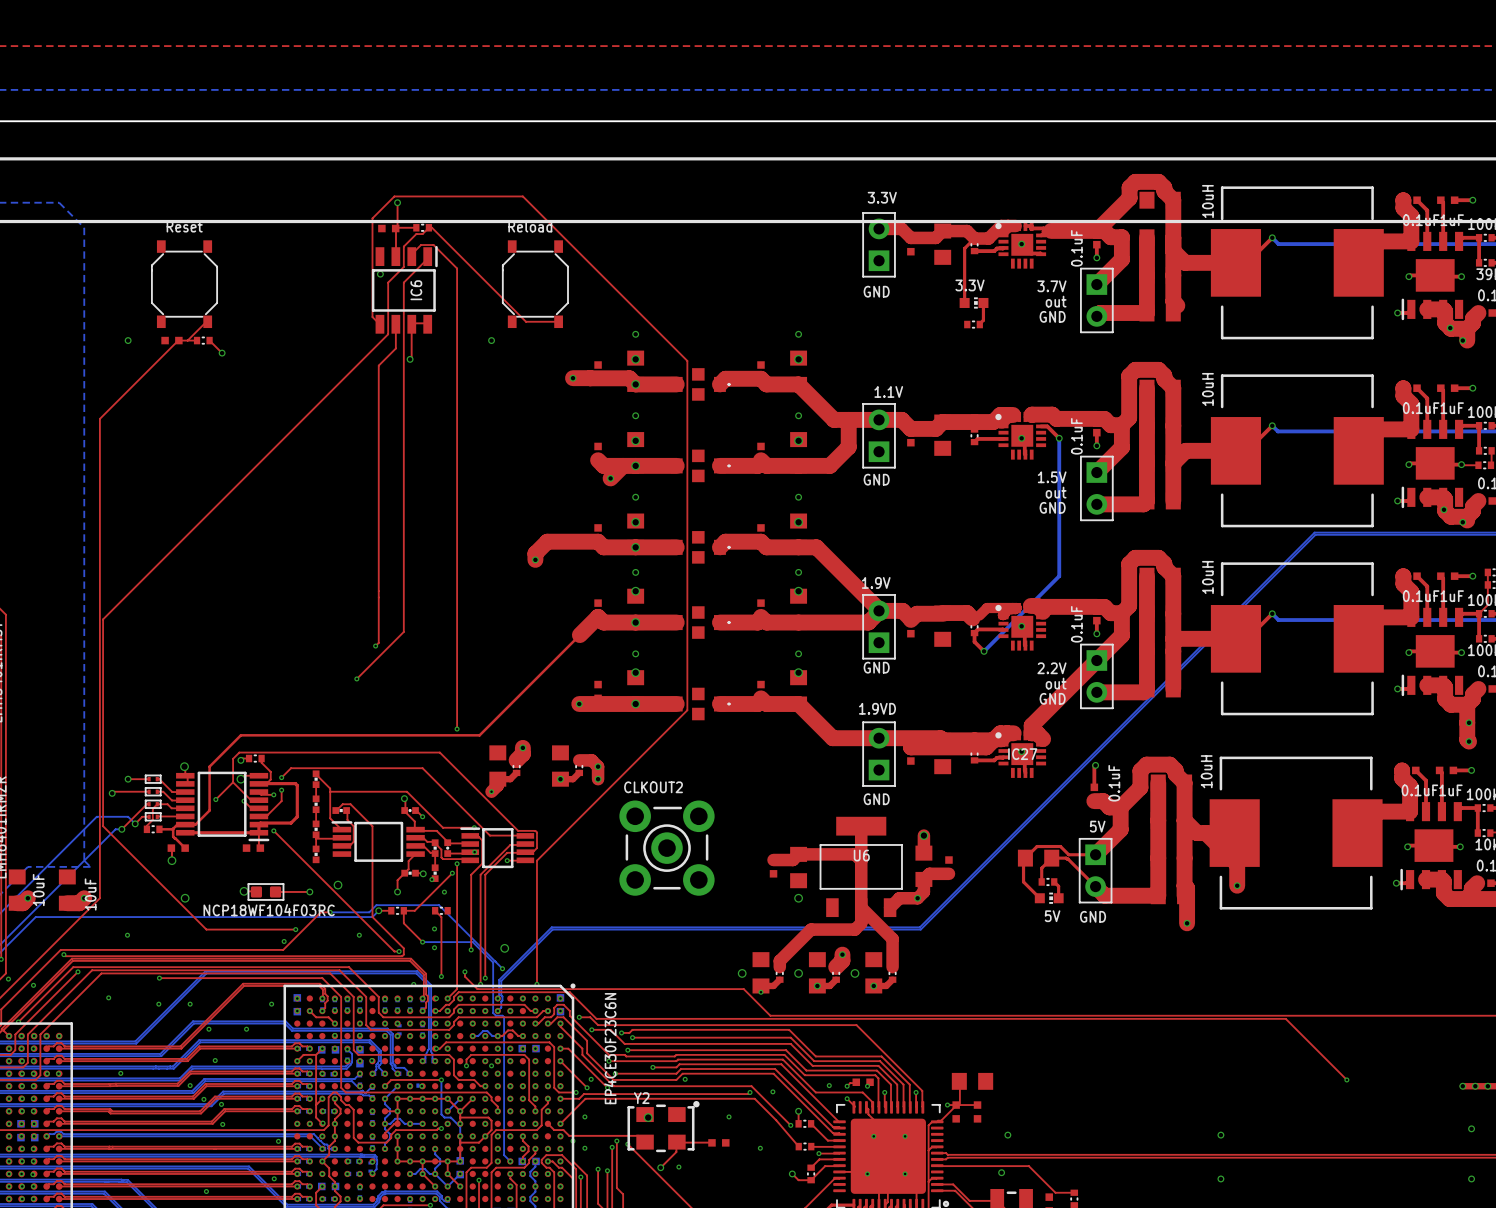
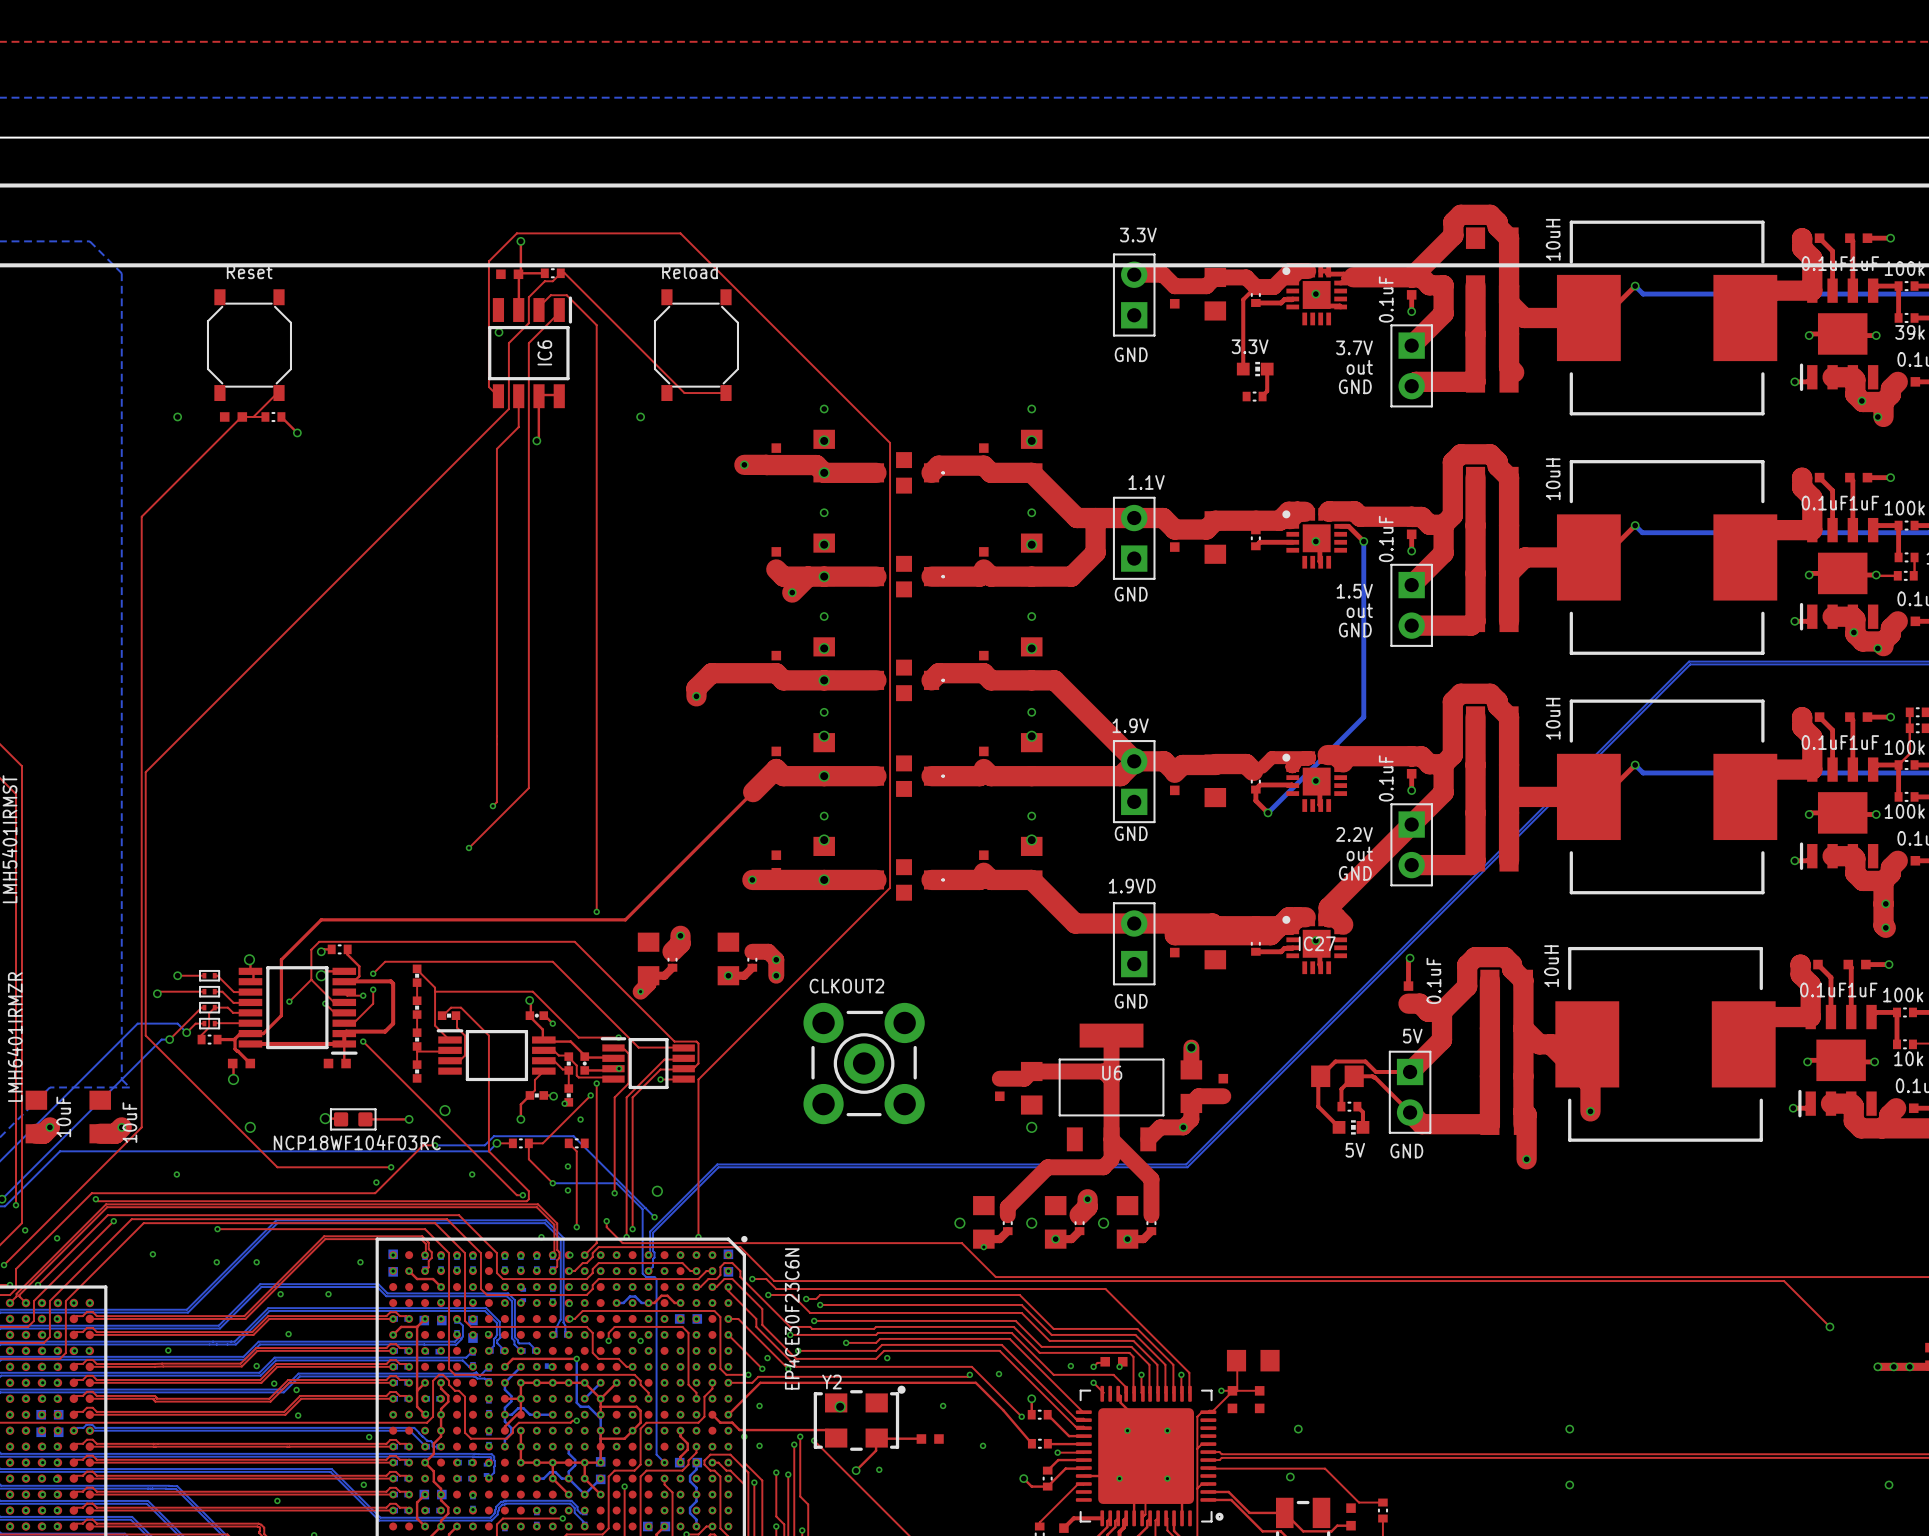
top track: (1285, 1018) (1346, 1079) -> (1652, 1281) (1784, 1281) (1829, 1326)
via: none -> (1829, 1326)
via: (1346, 1079) -> none
via: (1471, 1128) -> none

